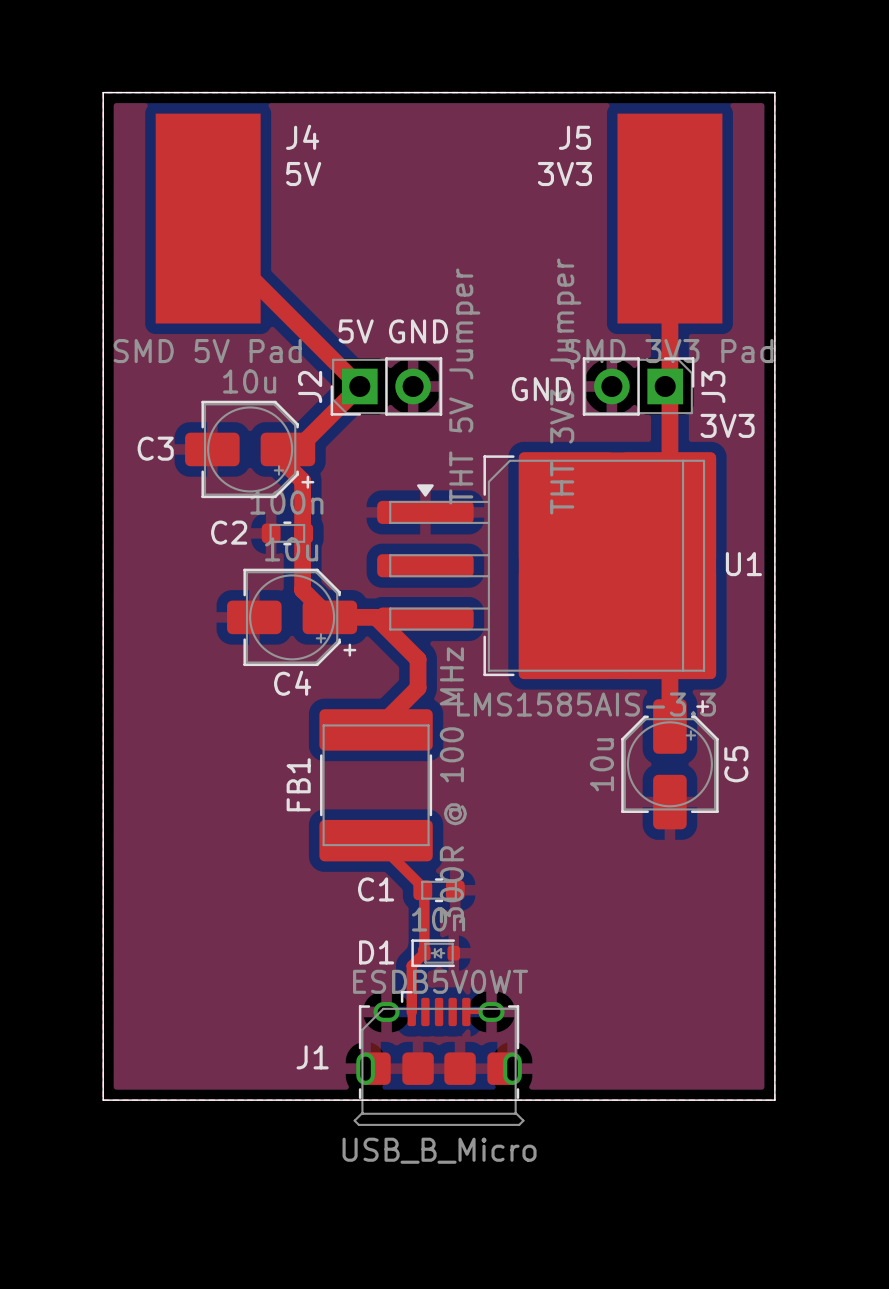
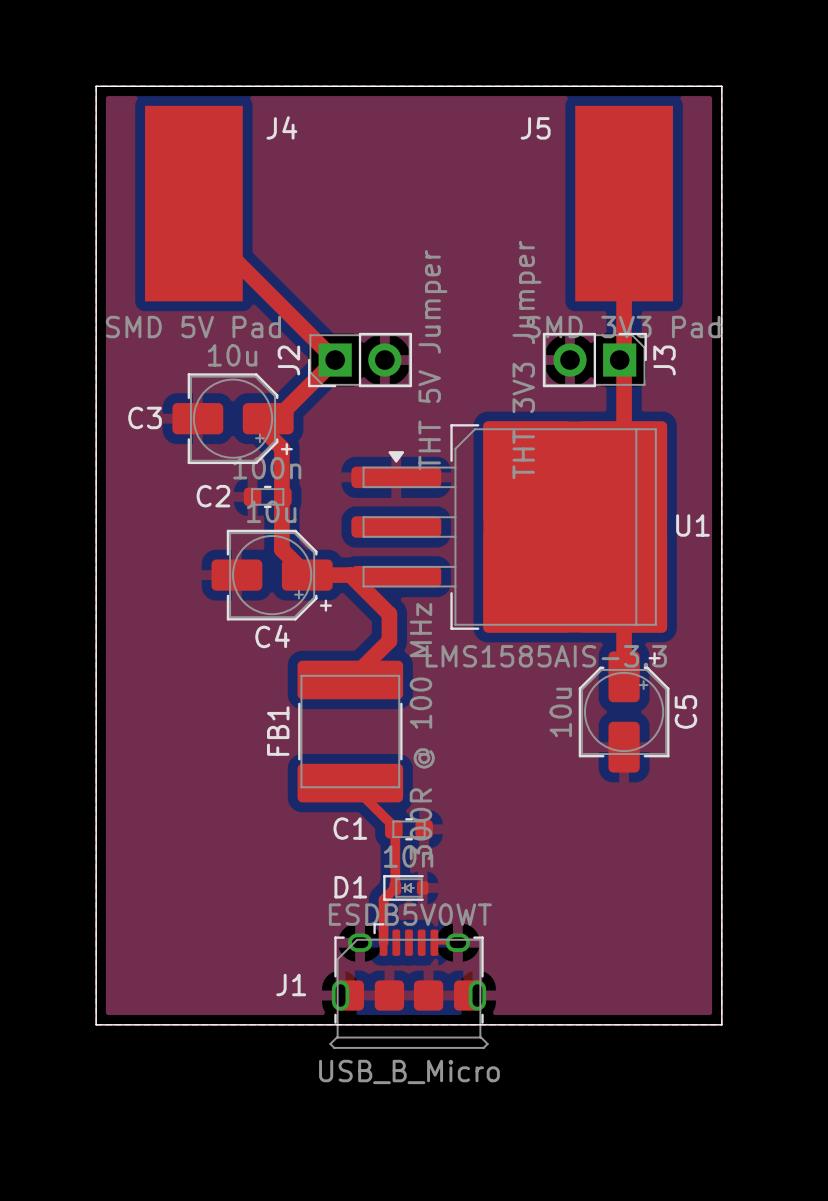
text: 5V (303, 174) -> none
text: 3V3 (564, 174) -> none
text: 5V (356, 331) -> none
text: GND (418, 331) -> none
text: GND (541, 389) -> none
text: 3V3 (727, 425) -> none

